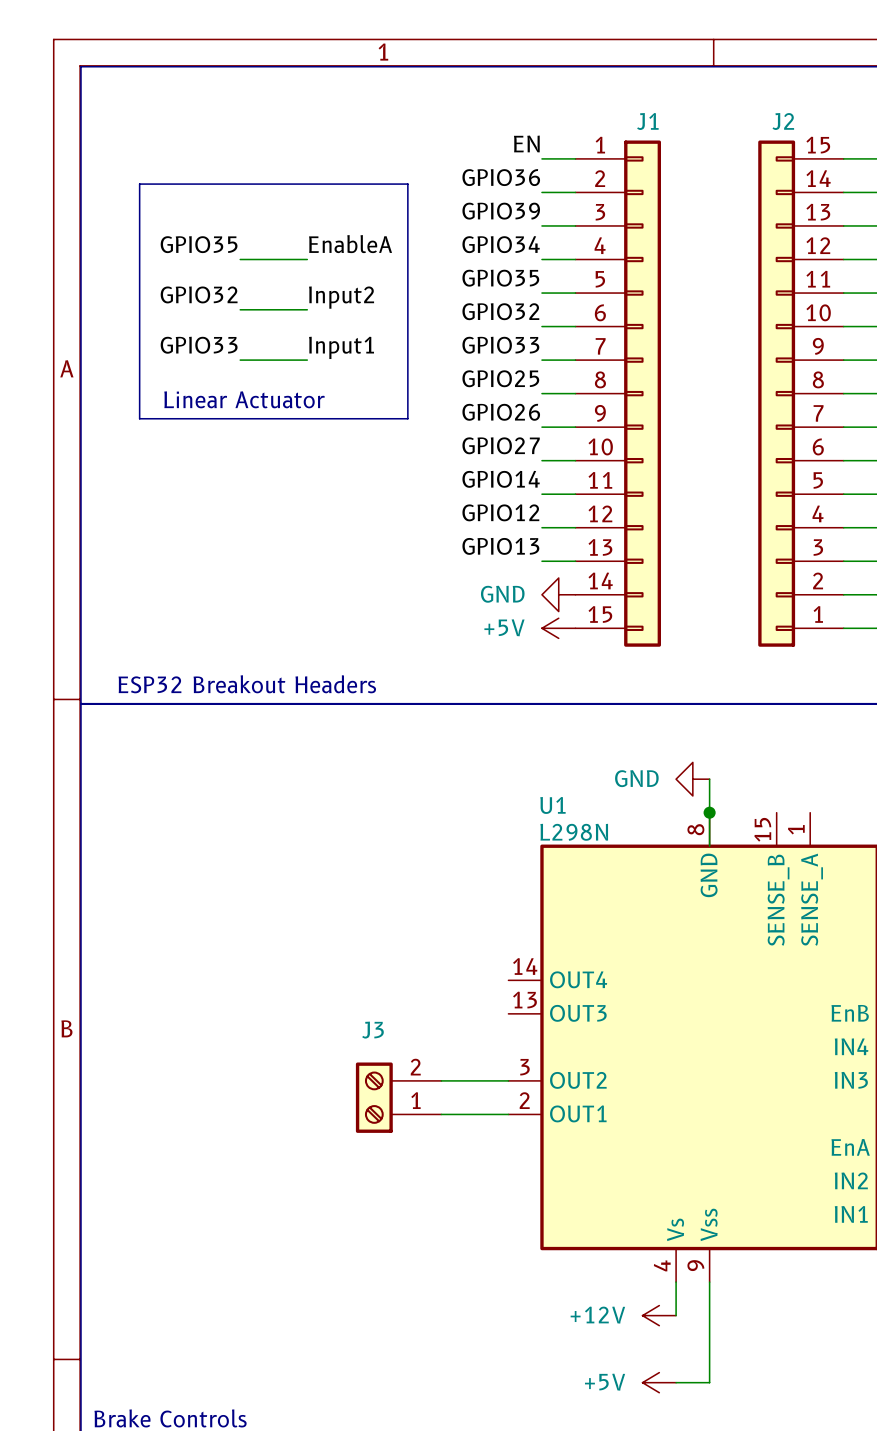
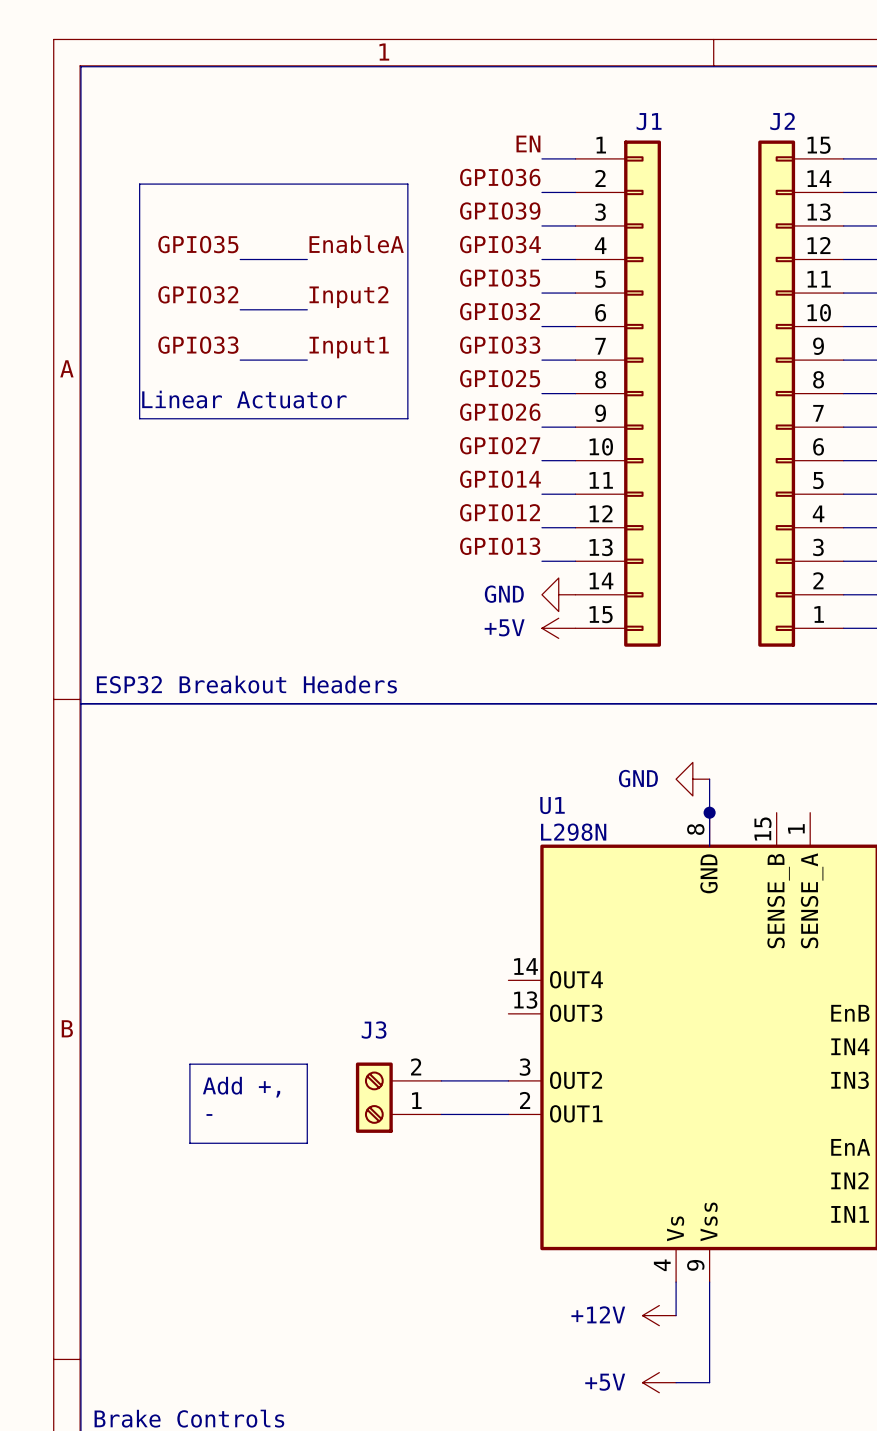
line: none -> (189, 1064) (307, 1064) (307, 1143) (189, 1143) (189, 1064)
text: none -> Add +, (241, 1087)
text: none -> - (209, 1114)

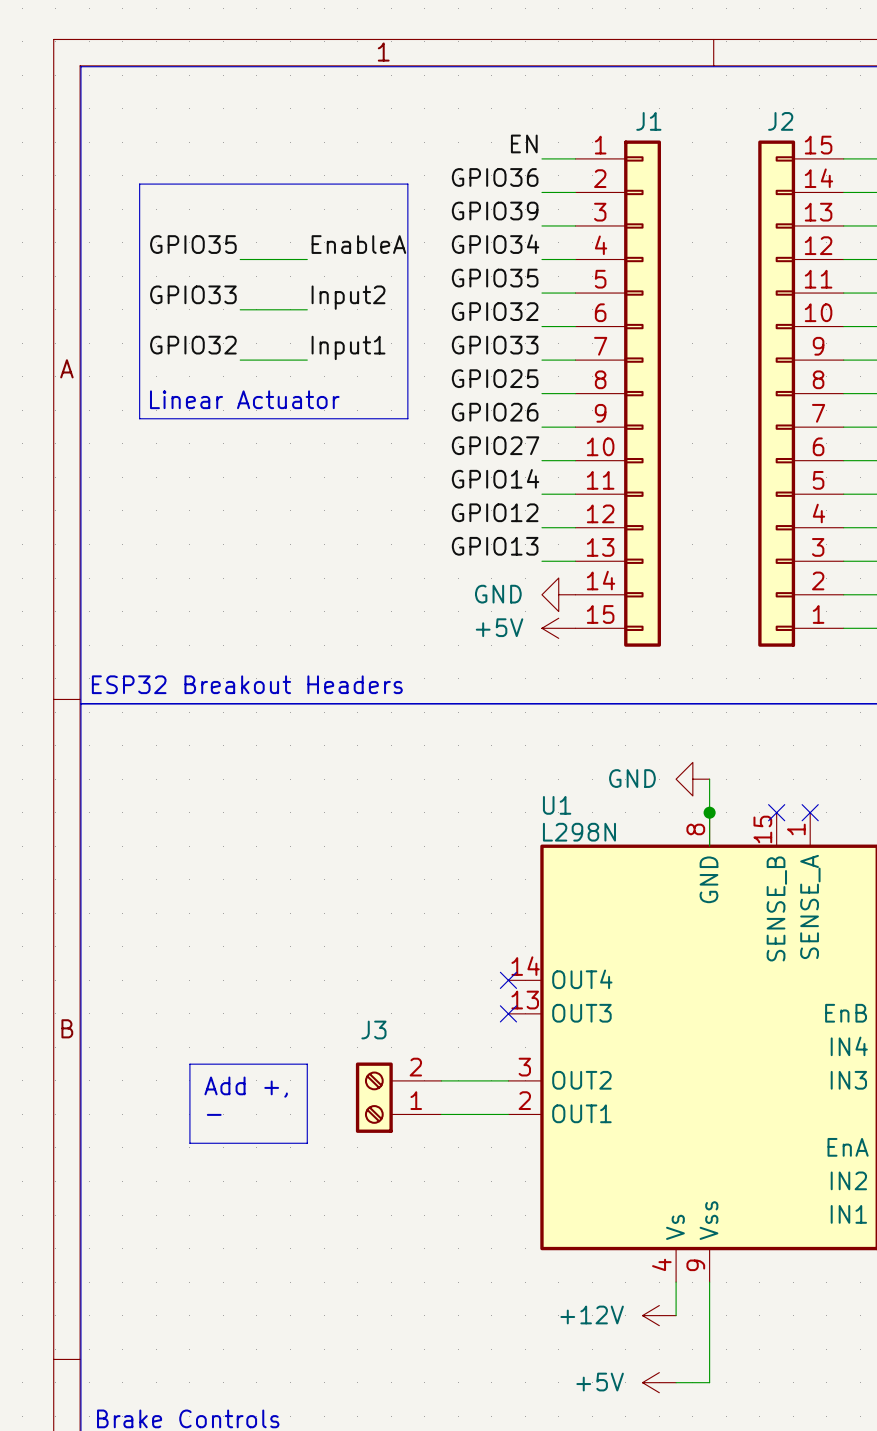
label: GPIO32 (198, 294) -> GPIO33 (193, 294)
label: GPIO33 (198, 345) -> GPIO32 (193, 345)
no-connect mark: none -> (776, 812)
no-connect mark: none -> (810, 812)
no-connect mark: none -> (508, 980)
no-connect mark: none -> (508, 1013)

